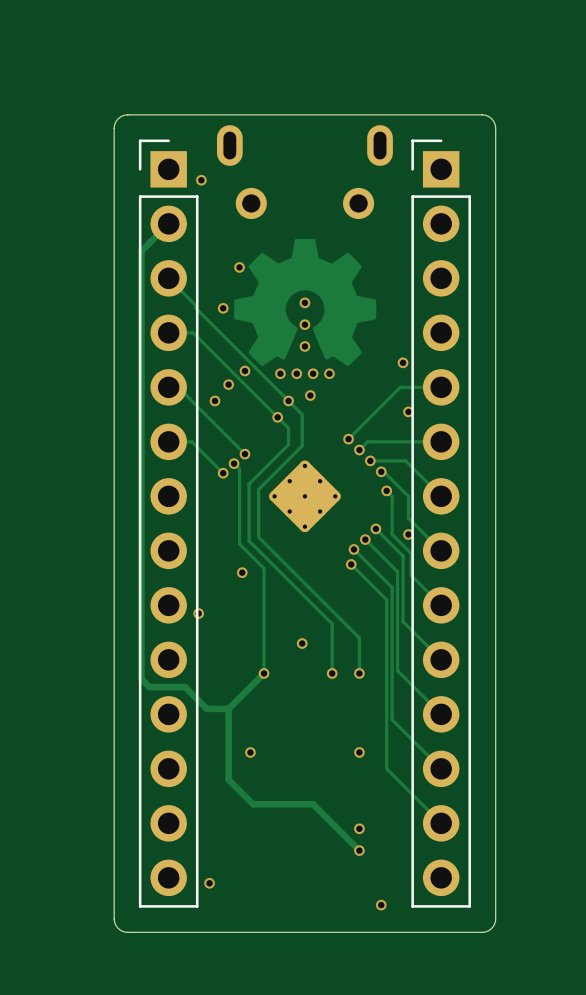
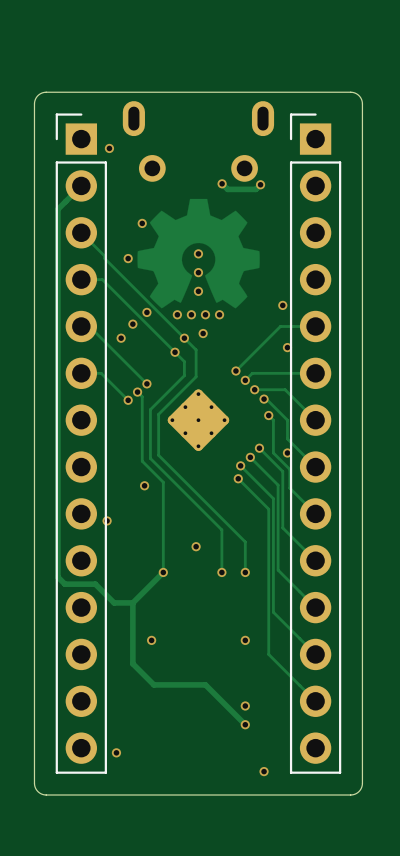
track: none -> (222, 183) (227, 189) (255, 189) (260, 184)
via: none -> (222, 183)
via: none -> (260, 184)

